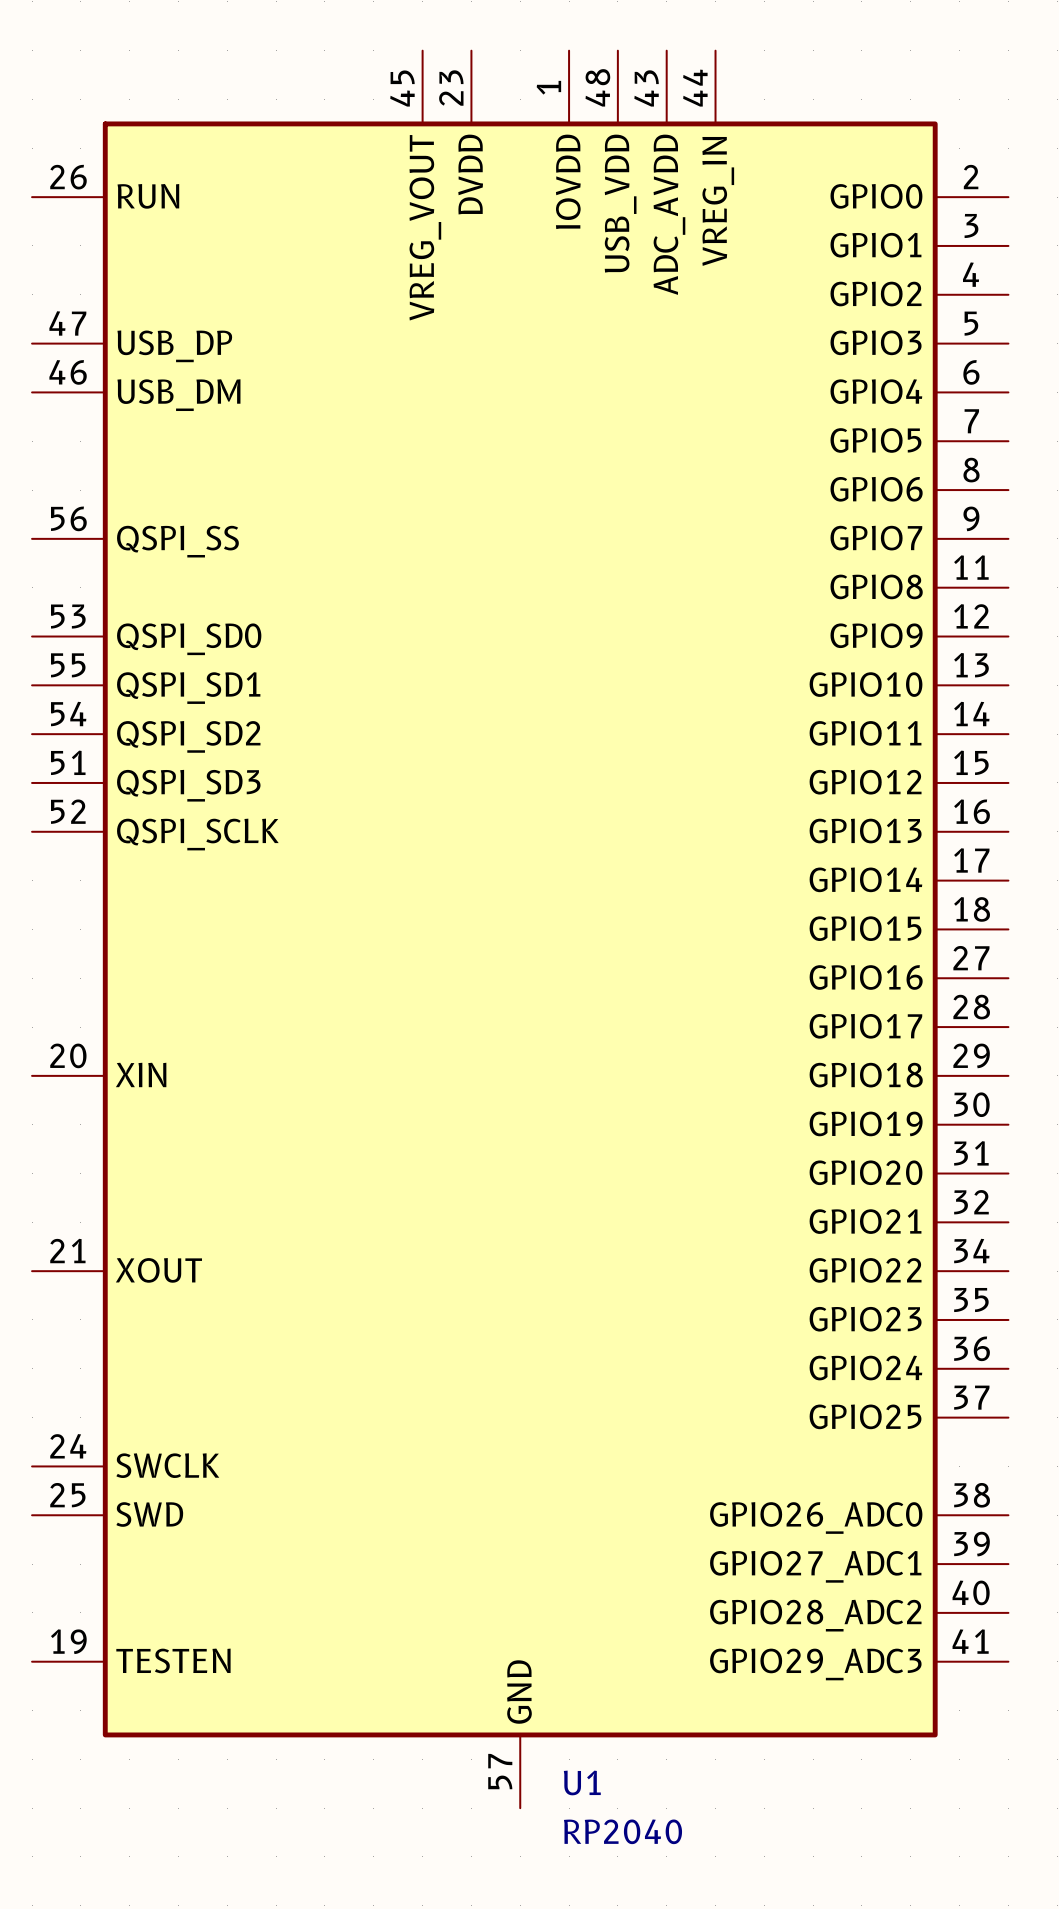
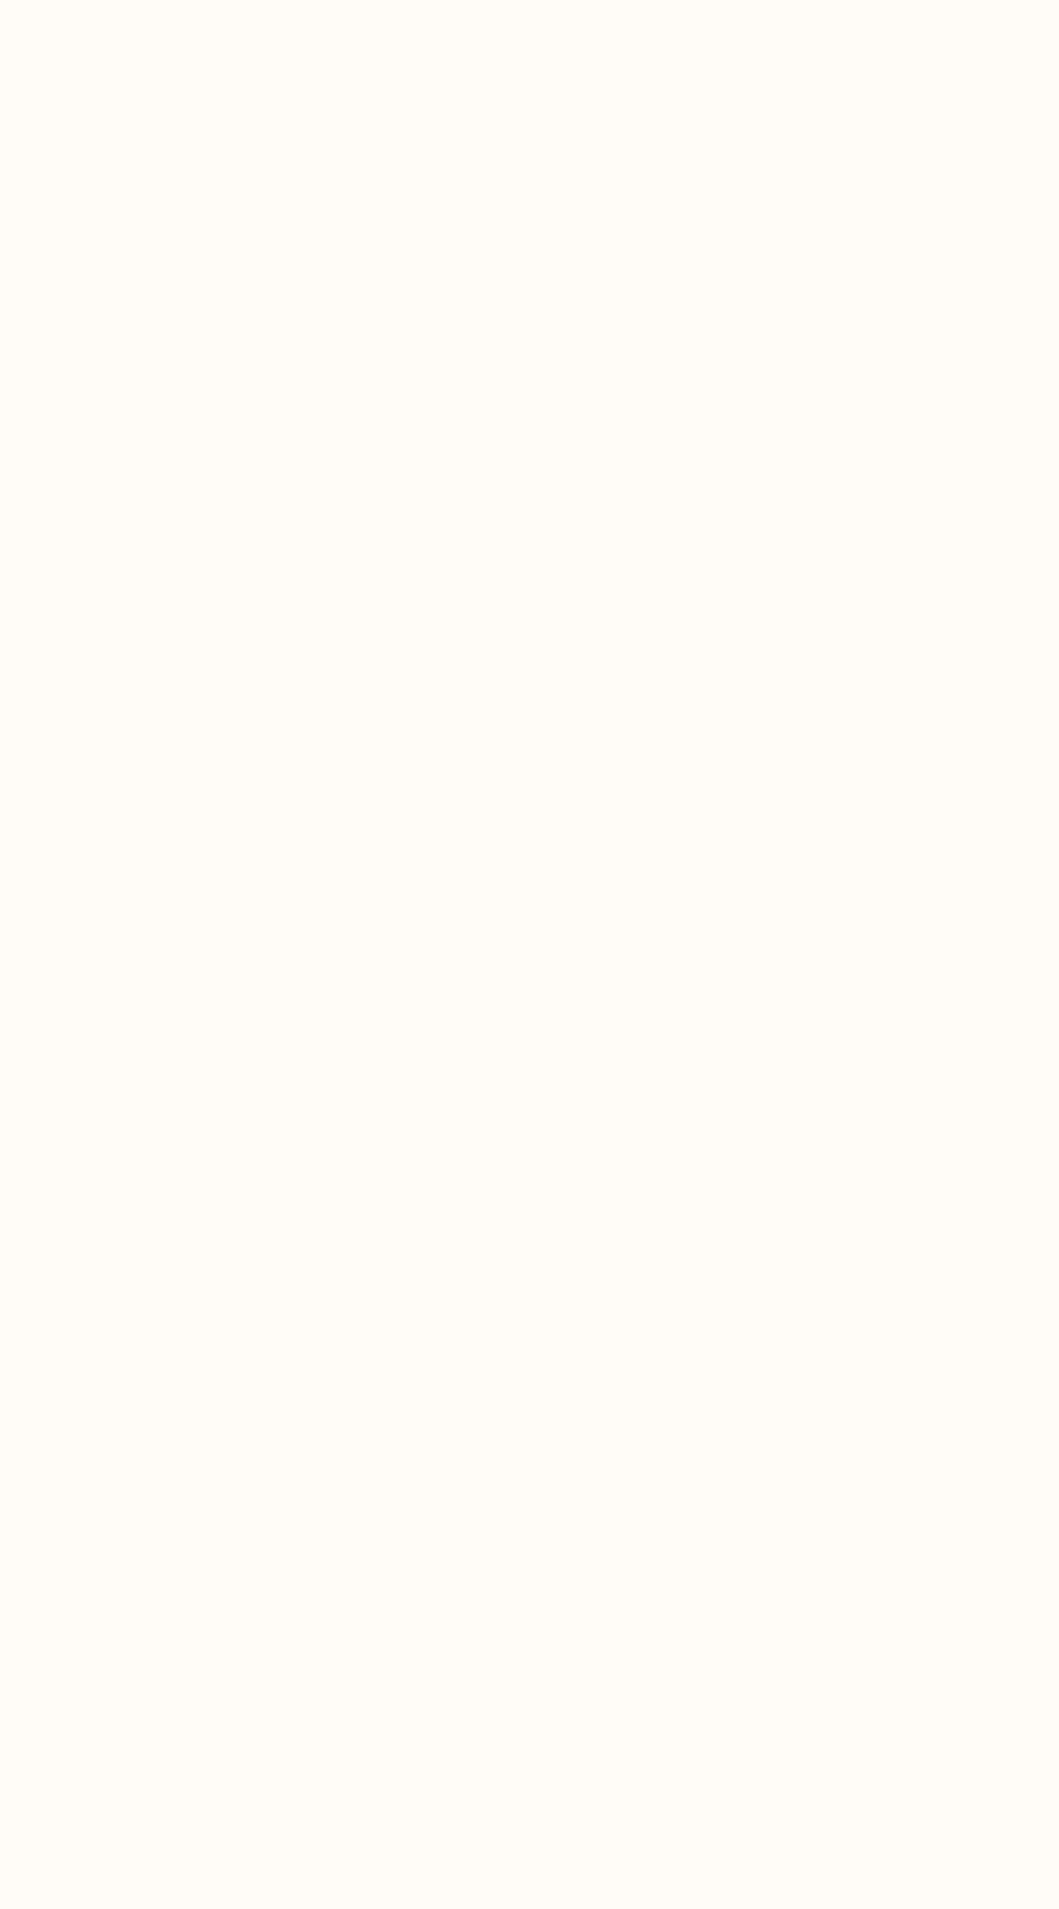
U1: RP2040 (520, 929) -> none

